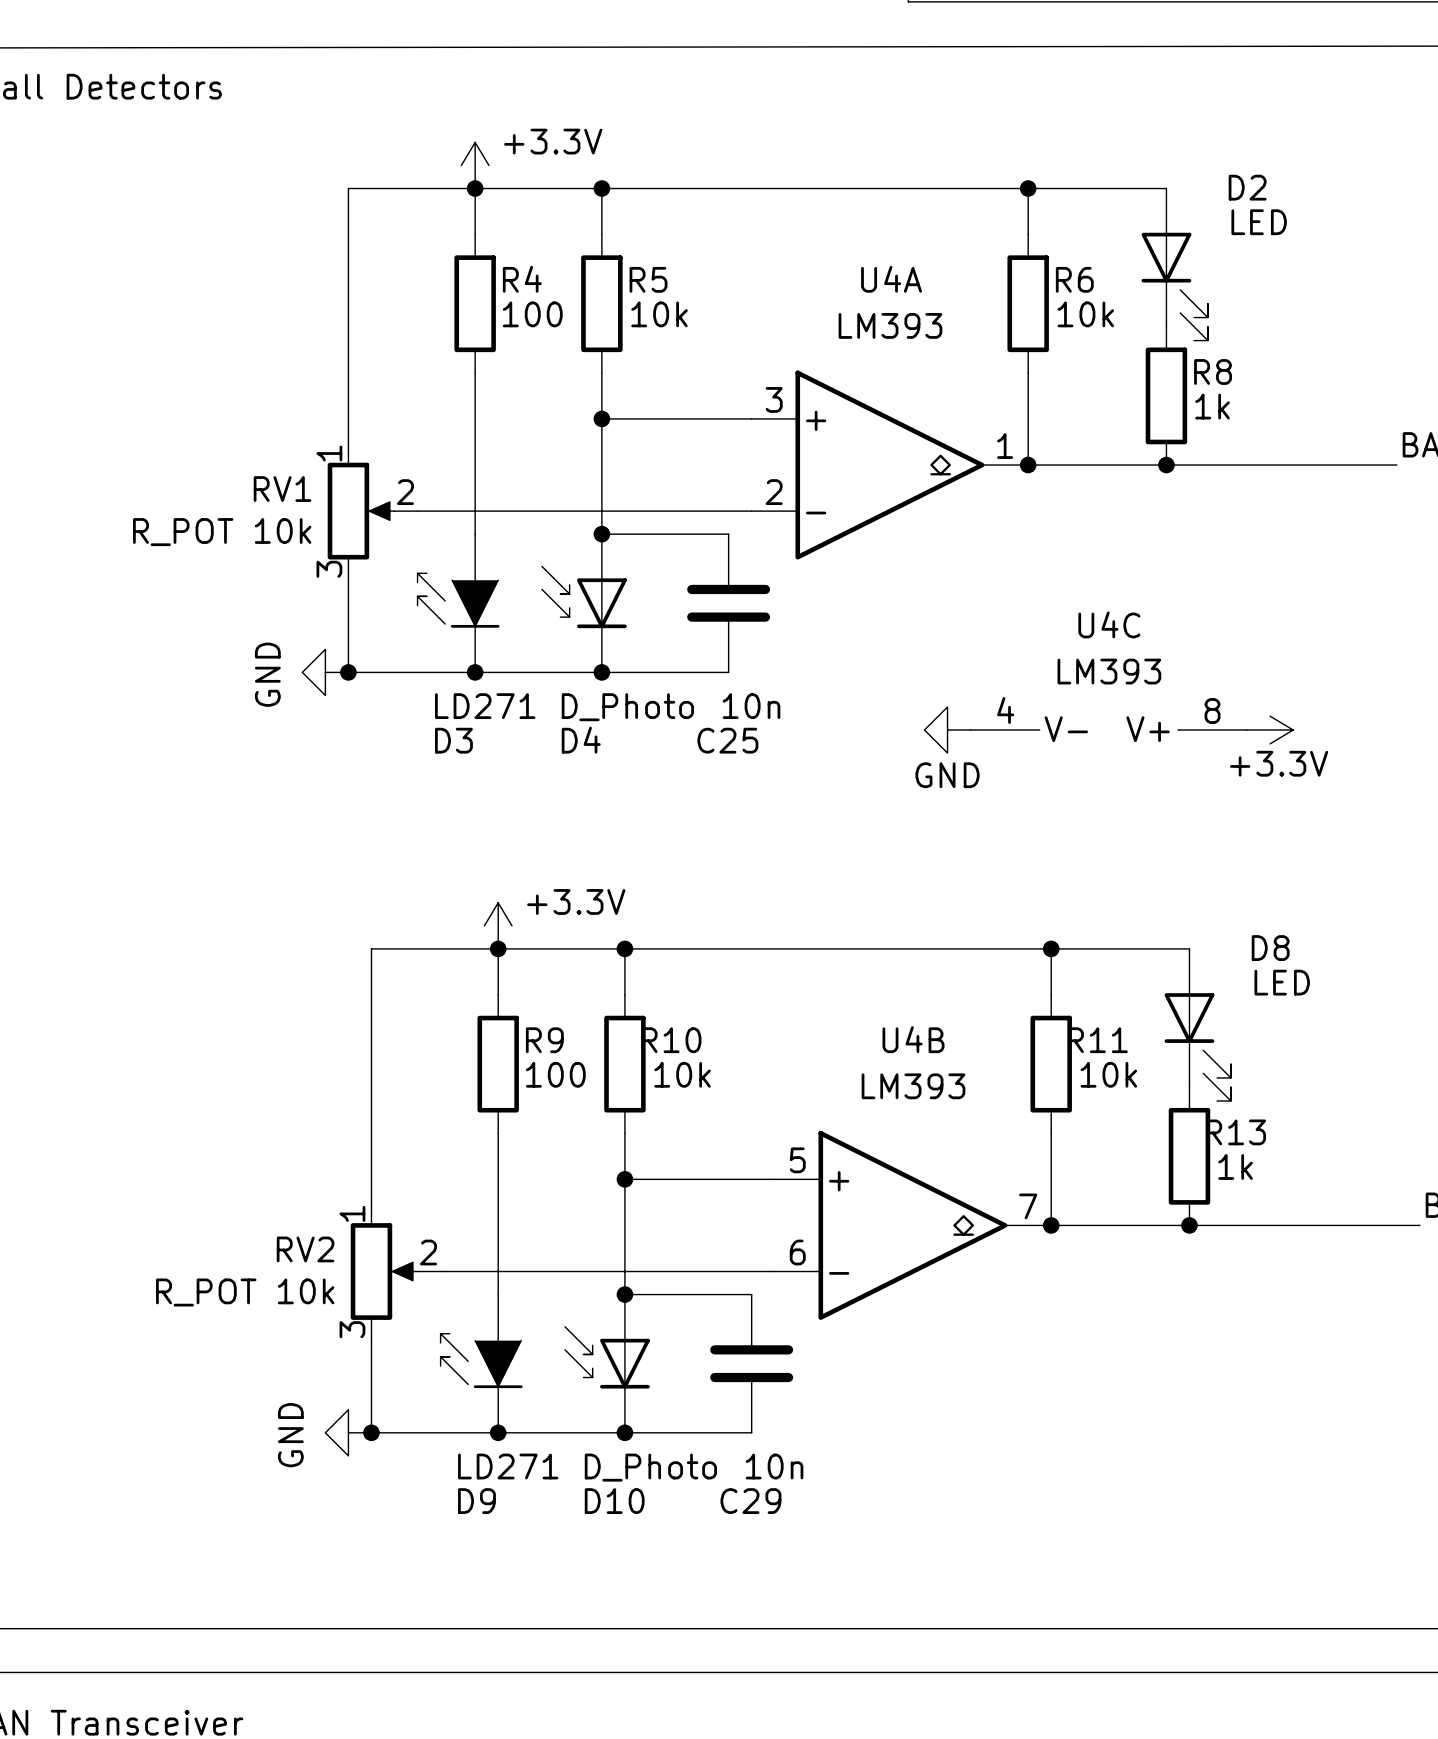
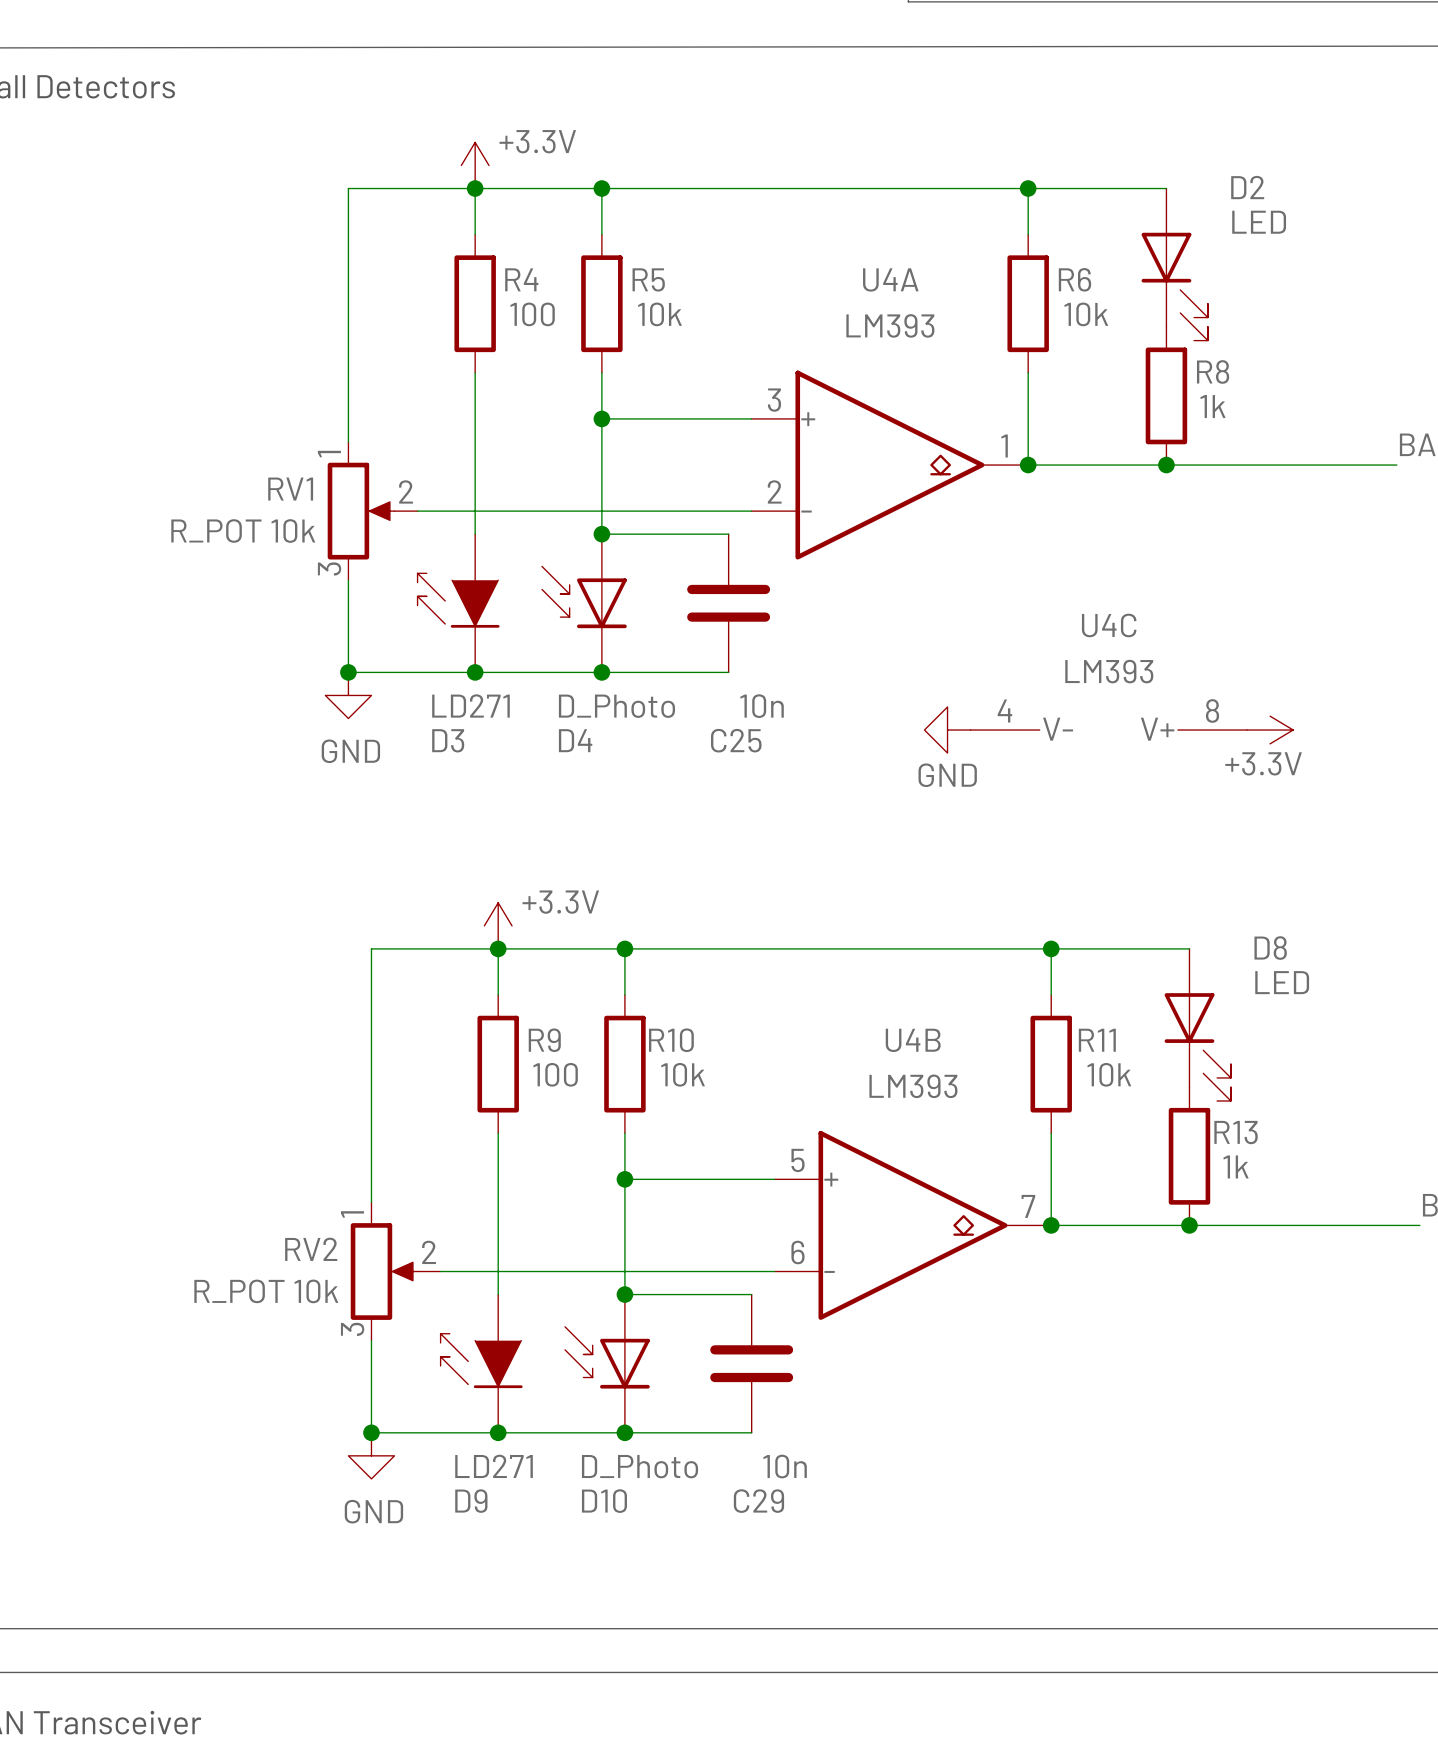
power symbol rotation: 0° (325, 672) -> 90° counterclockwise (348, 695)
power symbol position: GND (325, 672) -> GND (348, 695)
power symbol rotation: 0° (348, 1432) -> 90° counterclockwise (371, 1455)
power symbol position: GND (348, 1432) -> GND (371, 1455)

